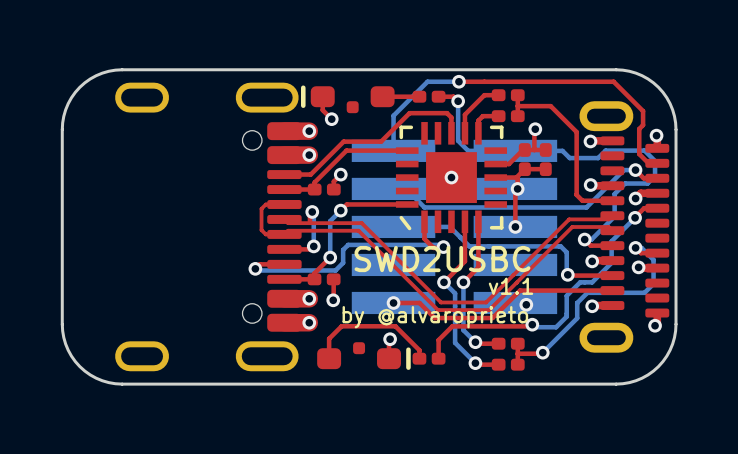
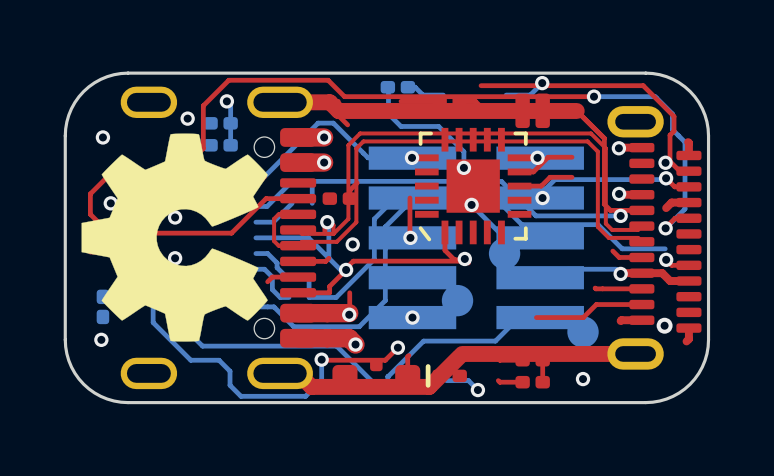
bottom track: none -> (542, 83) (530, 95) (506, 95)
via: none -> (542, 83)
bottom track: (458, 81) (427, 81) (393, 115) (393, 150) -> (264, 176) (318, 123) (333, 123) (368, 157) (412, 157)
via: (458, 81) -> none
bottom track: none -> (387, 87) (388, 113) (401, 126) (438, 126) (463, 151) (463, 167)
part: none -> (397, 87)
bottom track: none -> (407, 87) (415, 87) (422, 95) (443, 95)
top track: none -> (594, 96) (344, 96) (328, 80) (228, 80) (203, 105) (203, 148) (173, 178) (106, 178) (90, 193) (90, 214) (99, 223) (109, 223)
via: none -> (594, 96)
top track: (498, 95) (484, 95) (464, 114) (464, 133) -> none
bottom track: none -> (226, 101) (230, 105) (230, 145)
via: none -> (226, 101)
part: (347, 99) -> none
bottom track: (458, 101) (458, 140) (468, 150) (562, 150) (569, 158) (598, 158) (605, 150) (644, 150) (655, 161) (655, 176) (647, 183) (625, 183) (614, 194) (614, 216) (591, 239) (584, 239) -> none
via: (458, 101) -> none
top track: (517, 106) (550, 106) -> (280, 102) (329, 102) (338, 110) (576, 110)
via: none -> (187, 118)
top track: (498, 116) (482, 116) (478, 120) (478, 133) -> none
via: (331, 119) -> none
drawing: none -> [81, 133, 268, 342]
via: (535, 129) -> none
top track: (534, 130) (534, 150) -> none
via: none -> (102, 137)
top track: (451, 133) (451, 117) (446, 113) (409, 113) (381, 141) (343, 141) (310, 174) (284, 174) -> none
via: (656, 135) -> none
via: none -> (412, 157)
top track: (407, 150) (346, 150) (314, 182) (314, 189) (284, 189) -> (90, 251) (101, 251) (120, 233) (231, 233) (266, 198) (298, 198)
via: none -> (537, 157)
via: none -> (665, 162)
part side: top (524, 159) -> bottom (220, 123)
part side: top (545, 159) -> bottom (220, 145)
via: none -> (463, 167)
bottom track: (635, 170) (623, 170) (586, 207) (424, 207) (405, 188) (393, 188) -> none
bottom track: none -> (292, 181) (267, 206) (255, 206)
via: (340, 174) -> none
bottom track: none -> (665, 183) (661, 179) (554, 179) (537, 197)
via: (451, 177) -> none
top track: (516, 177) (515, 226) -> none
top track: none -> (409, 198) (410, 237)
via: none -> (110, 203)
bottom track: none -> (292, 203) (273, 222) (255, 222)
bottom track: none -> (312, 203) (312, 181) (501, 181) (535, 215) (620, 215)
via: none -> (471, 204)
via: (635, 198) -> none
top track: (407, 204) (346, 204) (340, 210) -> none
via: none -> (620, 215)
via: none -> (175, 217)
bottom track: (340, 210) (330, 221) (330, 257) -> none
via: (340, 210) -> none
bottom track: (635, 217) (611, 241) (611, 262) (592, 282) (580, 282) (566, 295) (566, 316) (556, 327) (533, 327) (532, 324) -> (665, 228) (685, 208) (685, 142) (672, 129) (672, 113) (655, 96) (594, 96)
top track: (584, 219) (569, 219) (486, 302) (441, 302) (361, 223) (318, 223) -> (612, 229) (605, 223) (605, 148) (590, 133) (360, 133) (348, 145) (348, 218) (333, 233) (333, 225) (328, 220)
top track: (464, 221) (464, 261) (443, 282) -> none
top track: (478, 221) (478, 267) (463, 282) -> none
bottom track: none -> (255, 237) (308, 237) (342, 271)
via: none -> (410, 237)
bottom track: (393, 226) (449, 226) (469, 246) (560, 246) (566, 252) (567, 274) -> none
via: (515, 226) -> none
top track: (580, 227) (572, 227) (489, 310) (437, 310) (358, 230) (321, 230) -> (608, 237) (597, 226) (597, 151) (587, 141) (363, 141) (356, 148) (356, 222) (336, 241)
via: none -> (352, 244)
bottom track: none -> (665, 248) (622, 248) (598, 224) (521, 224) (487, 190) (403, 190) (374, 219) (374, 259) (336, 297) (309, 297) (309, 275)
via: (584, 239) -> none
bottom track: none -> (255, 253) (267, 253) (277, 262) (277, 267) (284, 275) (289, 275)
bottom track: none -> (504, 253) (504, 237) (471, 204) (407, 204) (385, 226) (385, 300) (359, 326) (293, 326) (273, 306) (233, 306) (226, 298)
part: none -> (504, 253)
via: none -> (175, 258)
via: (313, 246) -> none
bottom track: (443, 247) (441, 244) (348, 244) (343, 249) (343, 262) (335, 270) (257, 270) (255, 268) -> none
bottom track: (635, 247) (641, 247) (653, 259) (653, 283) (644, 292) (587, 292) (577, 302) (577, 318) (542, 352) -> none
top track: none -> (468, 262) (466, 261) (353, 261) (342, 271)
bottom track: none -> (135, 269) (135, 271) (153, 289) (153, 322) (190, 360) (219, 360) (230, 371) (230, 385) (241, 396) (305, 396) (321, 380) (321, 359)
bottom track: none -> (255, 269) (264, 269) (272, 277) (272, 289) (280, 297) (289, 297)
bottom track: none -> (567, 269) (615, 269) (620, 273)
text: SWD2USBC (442, 259) -> none
top track: none -> (641, 273) (662, 273) (669, 280)
via: (638, 267) -> none
via: (255, 268) -> none
via: (567, 274) -> none
part side: top (324, 279) -> bottom (102, 306)
bottom track: (443, 282) (455, 293) (455, 342) (475, 363) -> none
via: (443, 282) -> none
bottom track: (463, 282) (463, 330) (475, 342) -> none
via: (463, 282) -> none
bottom track: none -> (164, 298) (164, 307) (202, 346) (336, 346) (377, 386) (387, 386) (387, 376)
part: none -> (457, 300)
text: v1.1 (510, 286) -> none
top track: (568, 290) (520, 290) (492, 318) (434, 318) (419, 302) (393, 302) -> (596, 304) (583, 317) (536, 317)
top track: none -> (324, 313) (349, 313)
via: (309, 298) -> none
bottom track: none -> (520, 316) (495, 341) (423, 341) (388, 376)
via: (526, 304) -> none
via: (592, 306) -> none
via: none -> (664, 325)
part: none -> (583, 331)
text: by @alvaroprieto (435, 317) -> none
top track: none -> (324, 338) (349, 338) (355, 344)
via: (309, 322) -> none
via: none -> (101, 339)
top track: (532, 324) (530, 326) (452, 326) (441, 337) -> (635, 353) (462, 353)
via: (532, 324) -> none
via: (655, 325) -> none
via: none -> (355, 344)
top track: none -> (397, 347) (385, 360) (321, 359)
via position: (390, 339) -> (397, 347)
top track: (438, 340) (438, 358) -> (459, 356) (429, 386) (311, 386) (298, 373) (280, 373)
via: (475, 342) -> none
via: none -> (321, 359)
top track: (542, 352) (517, 353) -> none
via position: (542, 352) -> (583, 379)
top track: (329, 358) (329, 338) (341, 326) (395, 326) (419, 350) (419, 358) -> none
bottom track: none -> (446, 380) (468, 380) (477, 390)
via: (475, 363) -> none
via: none -> (477, 390)

